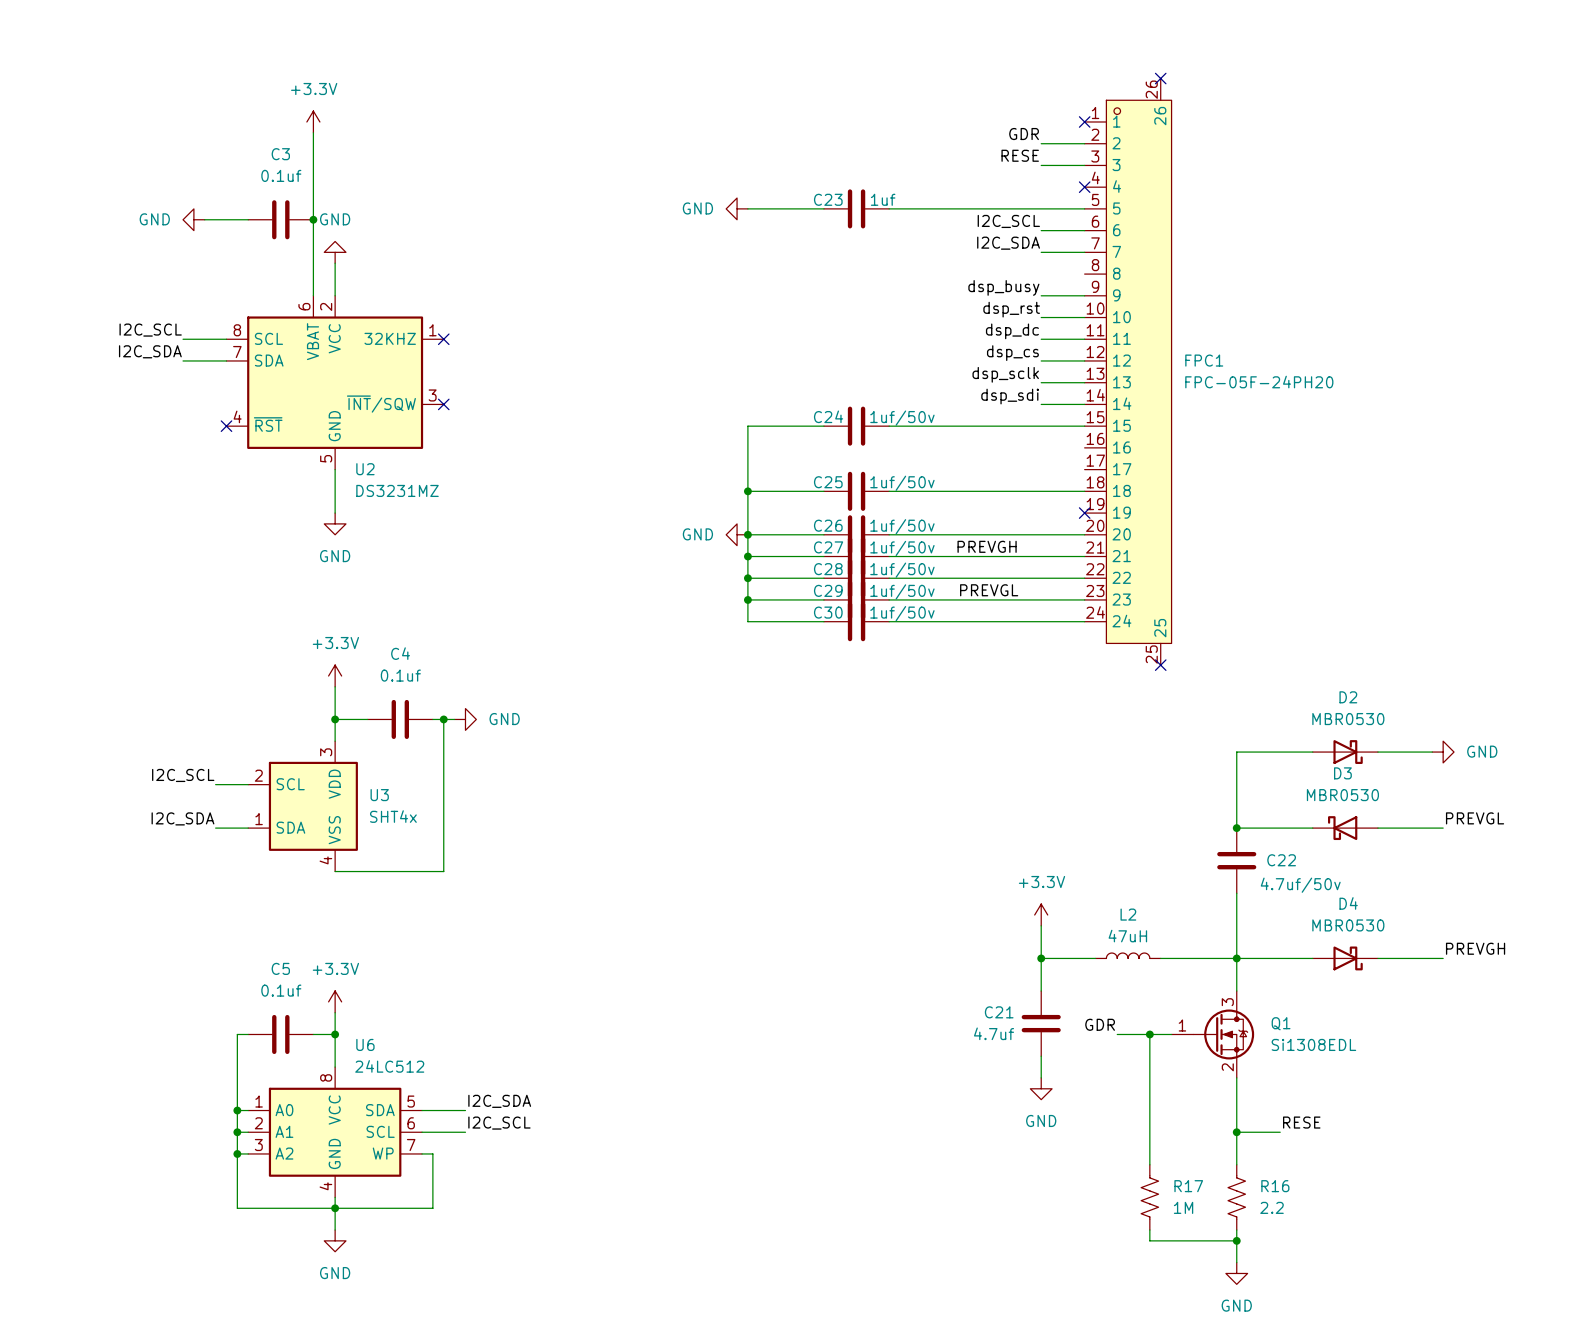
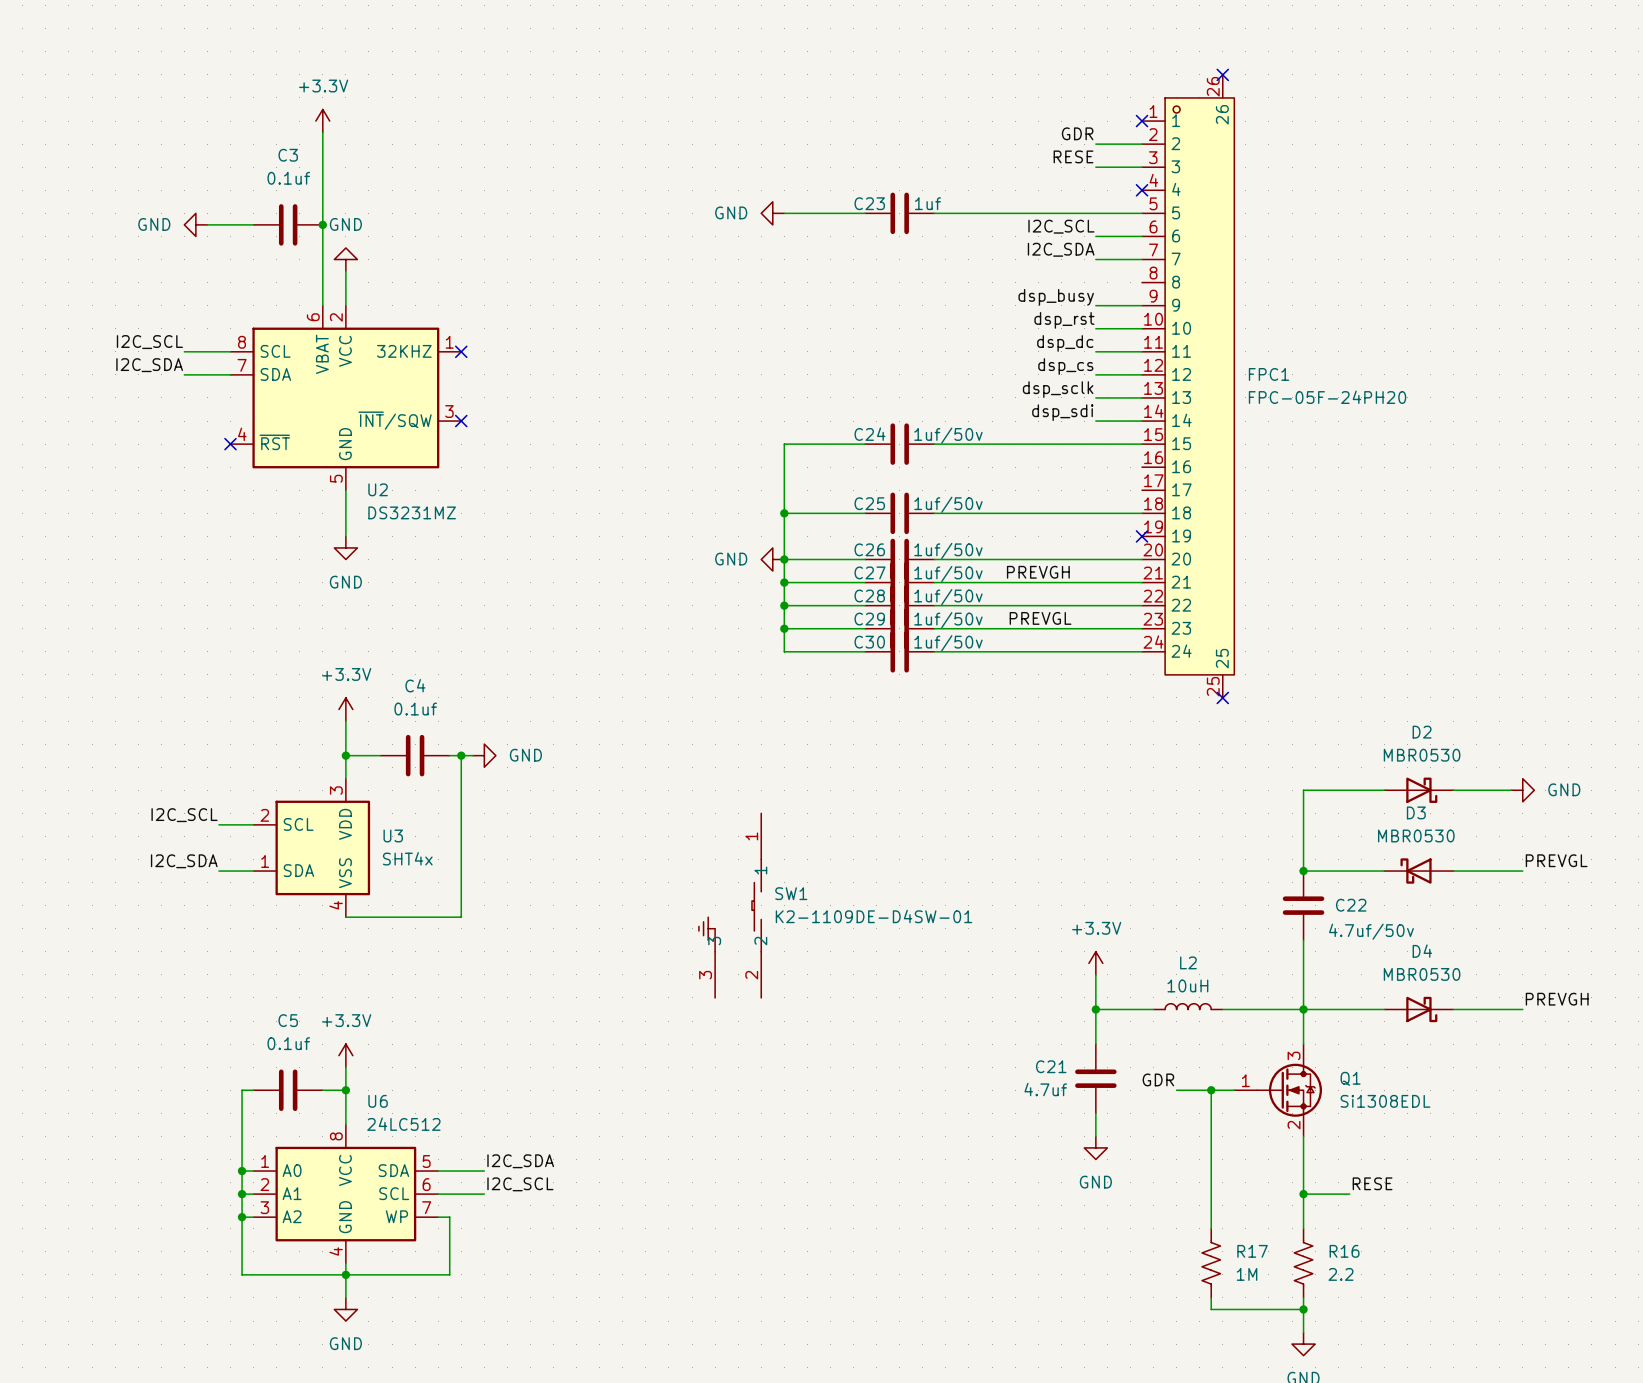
SW1: none -> K2-1109DE-D4SW-01 (730, 905)
L2 value: 47uH (1127, 936) -> 10uH (1187, 985)

